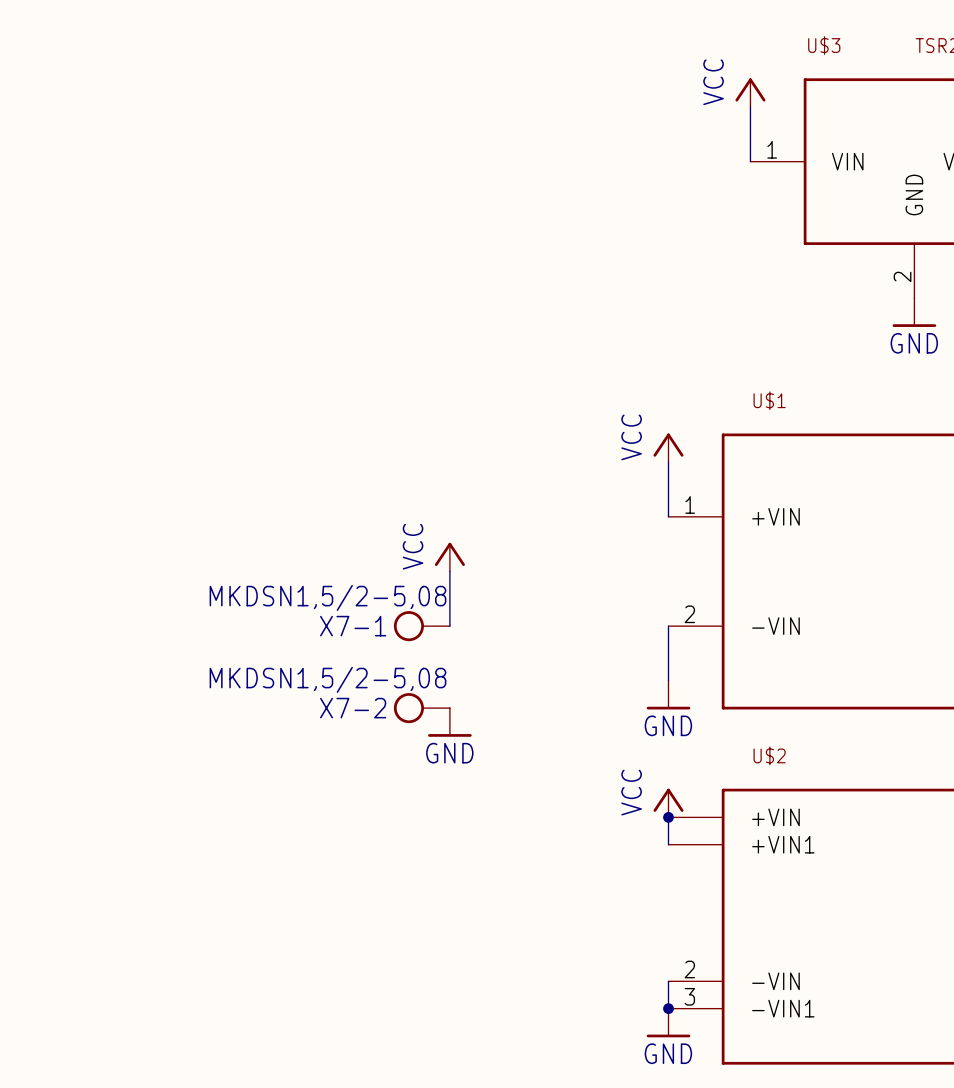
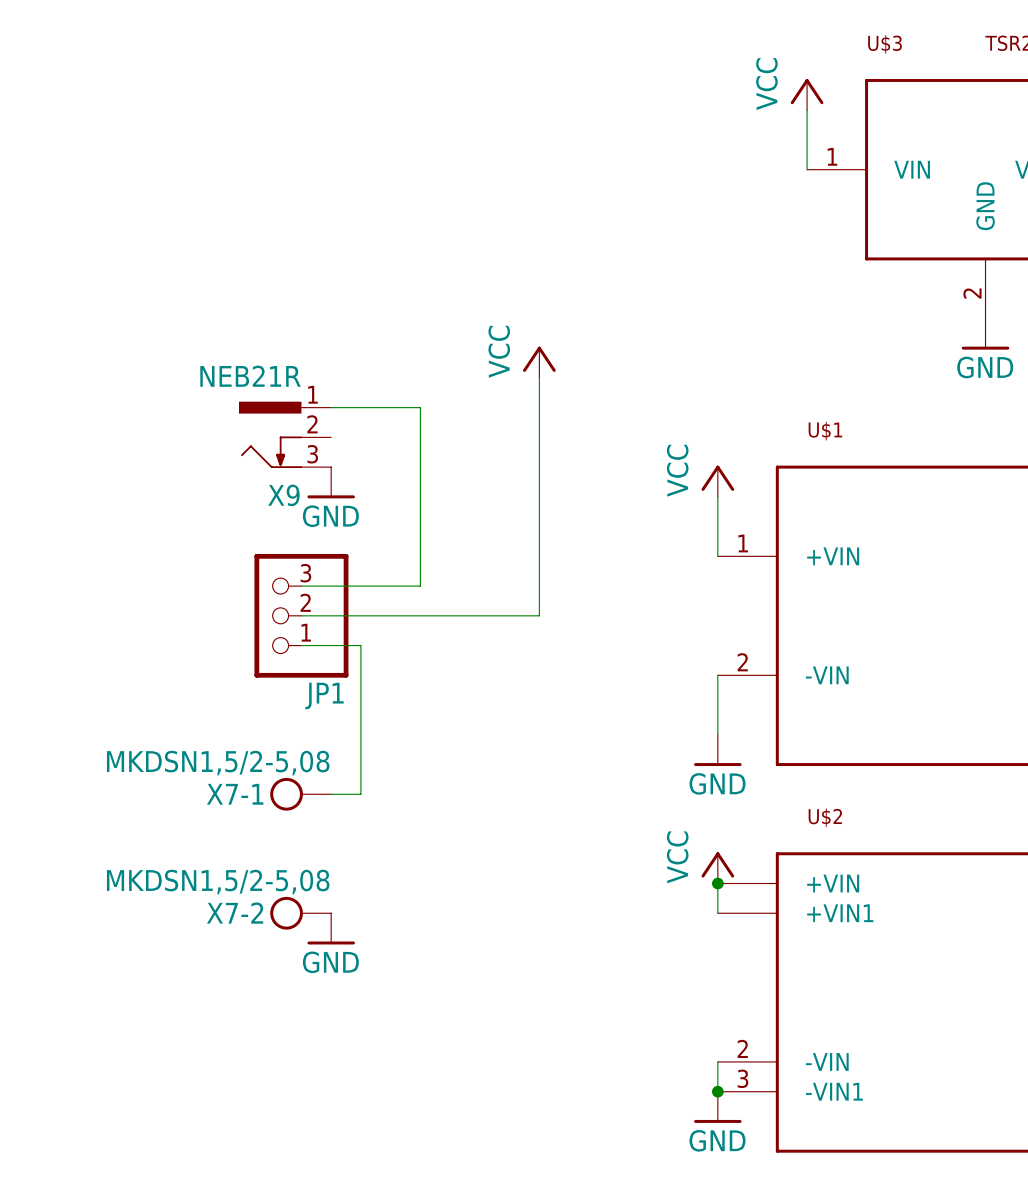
wire: none -> (539, 377) (539, 615) (301, 615)
wire: none -> (331, 407) (420, 407) (420, 586) (301, 586)
X9: none -> NEB21R (285, 434)
power symbol: none -> GND (331, 482)
power symbol position: VCC (449, 557) -> VCC (539, 362)
JP1: none -> (301, 615)
wire: (449, 571) (449, 626) -> none
wire: none -> (301, 645) (360, 645) (360, 794) (331, 794)
X7-1 position: (421, 626) -> (300, 794)
X7-2 position: (421, 708) -> (300, 913)
power symbol: GND (449, 722) -> none
power symbol: none -> GND (331, 928)

